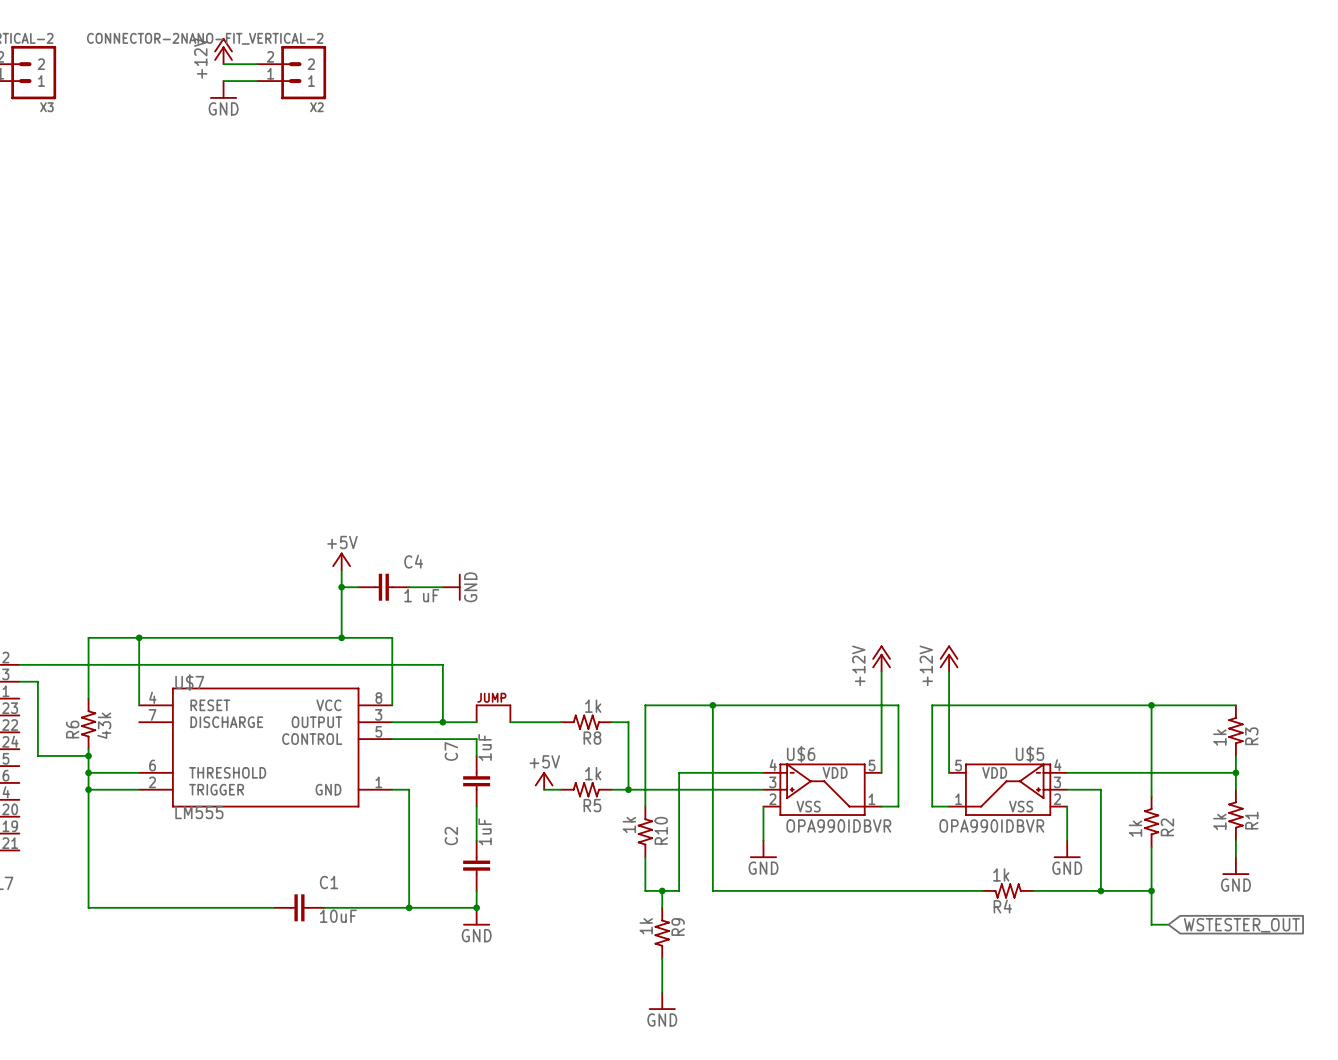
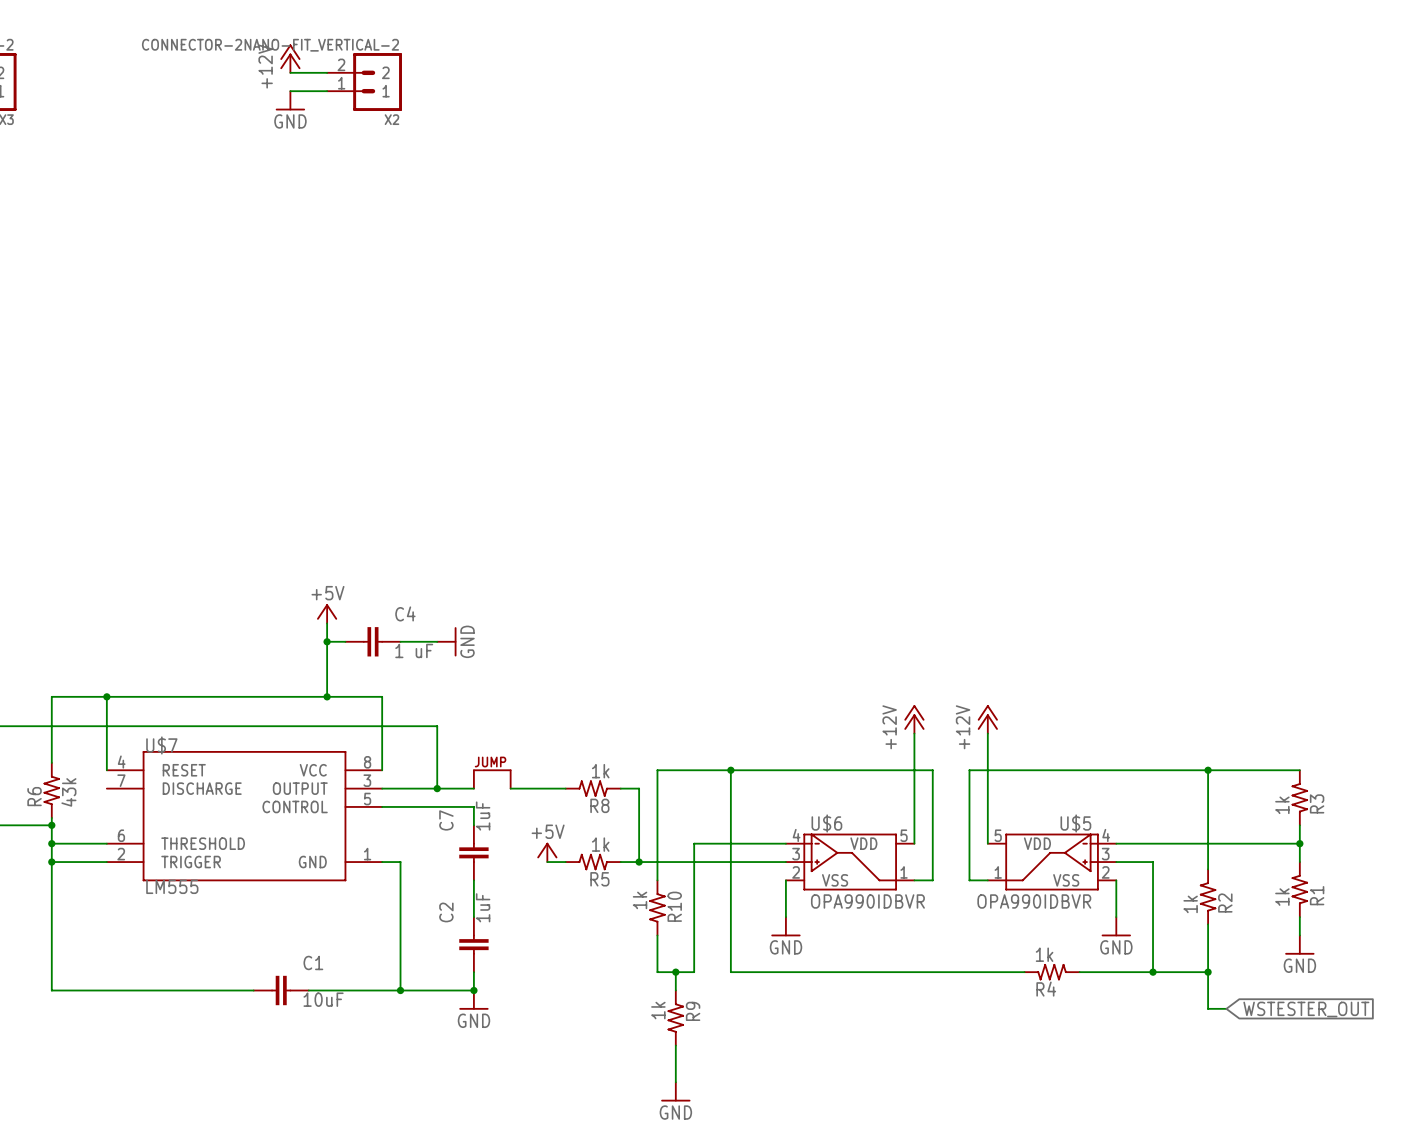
power symbol position: +12V (223, 51) -> +12V (290, 58)
wire: (223, 64) (257, 64) -> (290, 72) (327, 72)
X2 position: (291, 72) -> (364, 82)
wire: (223, 81) (257, 81) -> (290, 91) (327, 91)
power symbol position: GND (223, 89) -> GND (290, 100)

